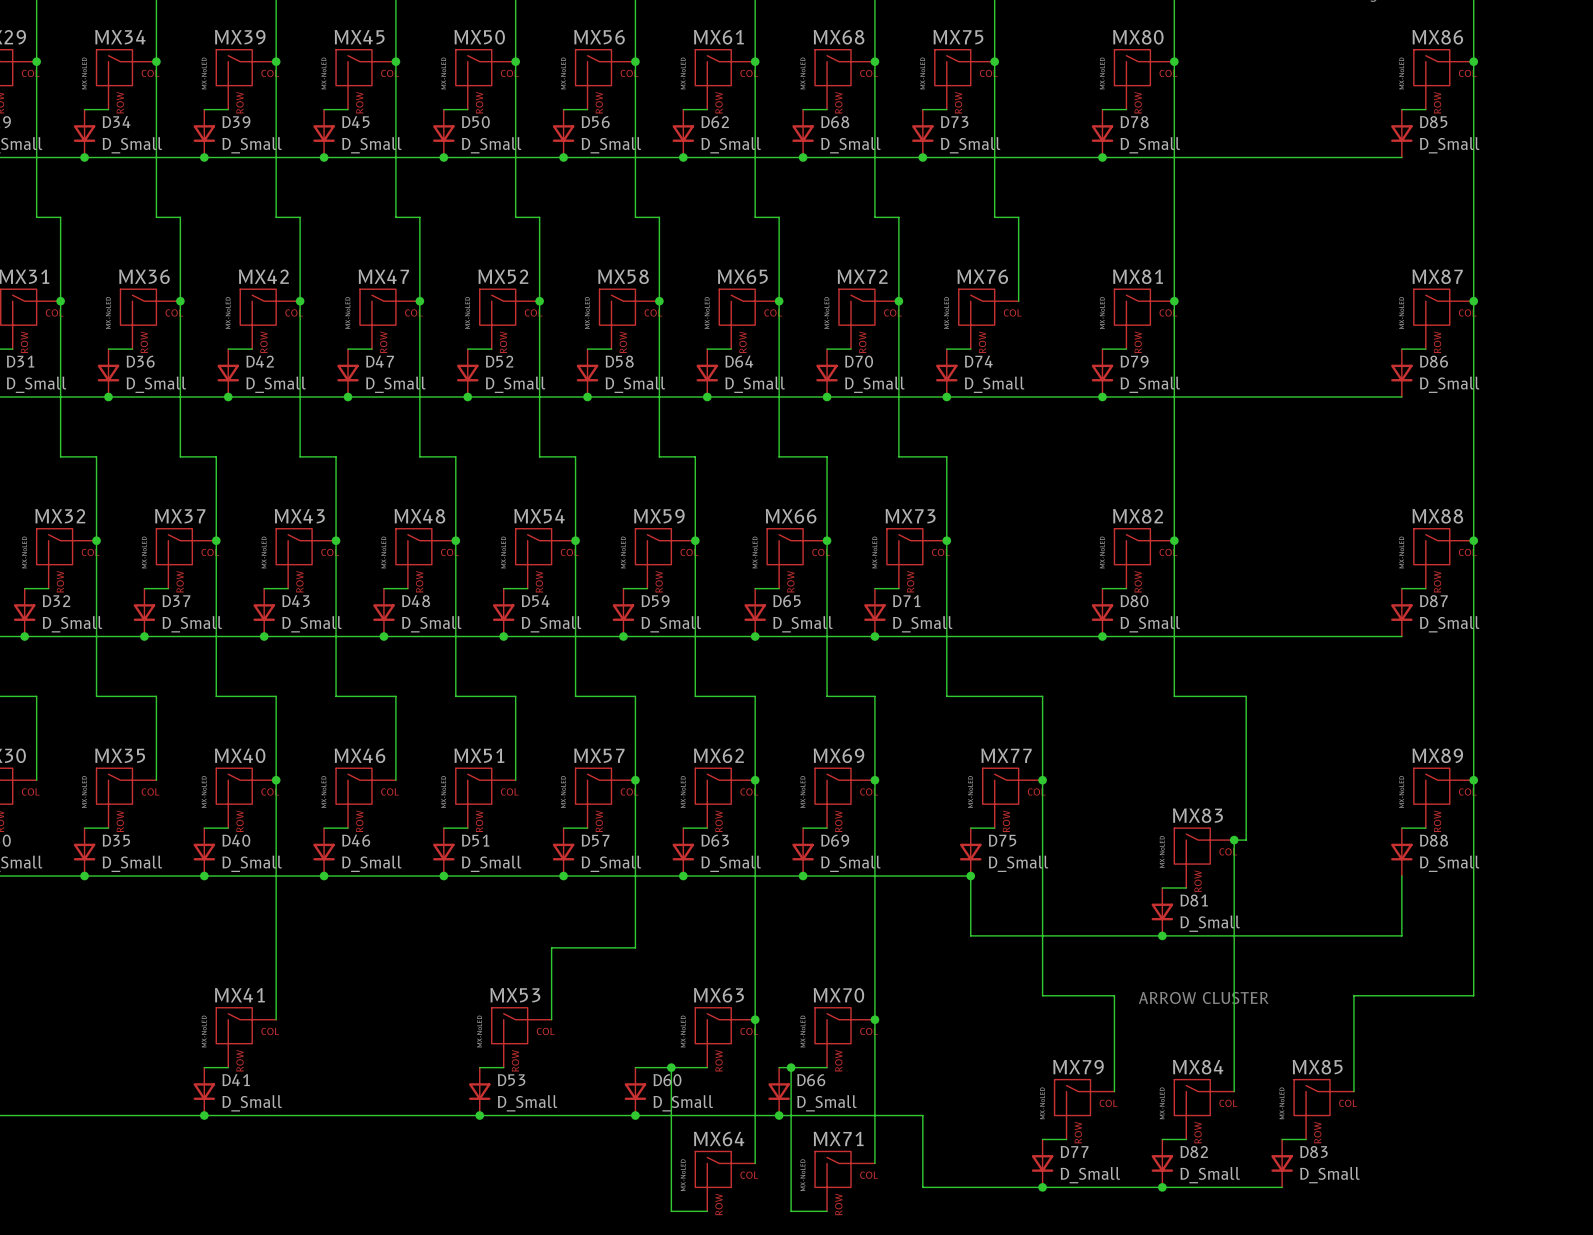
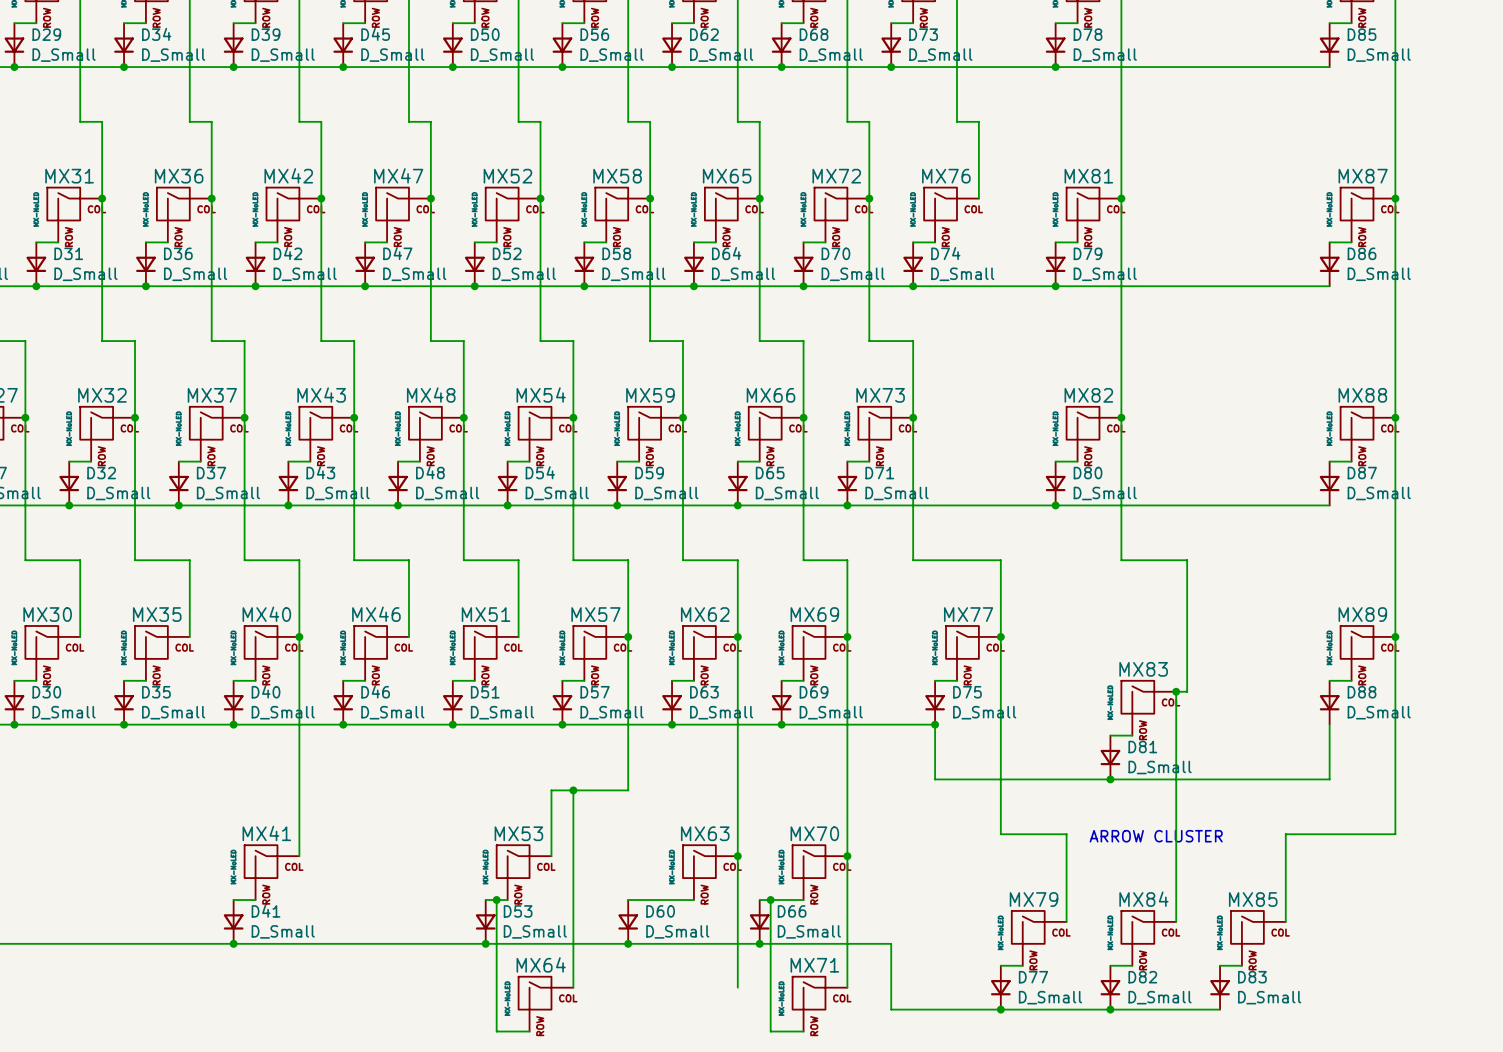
wire: none -> (573, 790) (573, 987)
junction: none -> (573, 790)
junction: none -> (496, 900)
wire: (671, 1067) (671, 1211) (707, 1211) -> (496, 900) (496, 1031) (529, 1031)
junction: (671, 1067) -> none
MX64 position: (725, 1181) -> (545, 1004)

